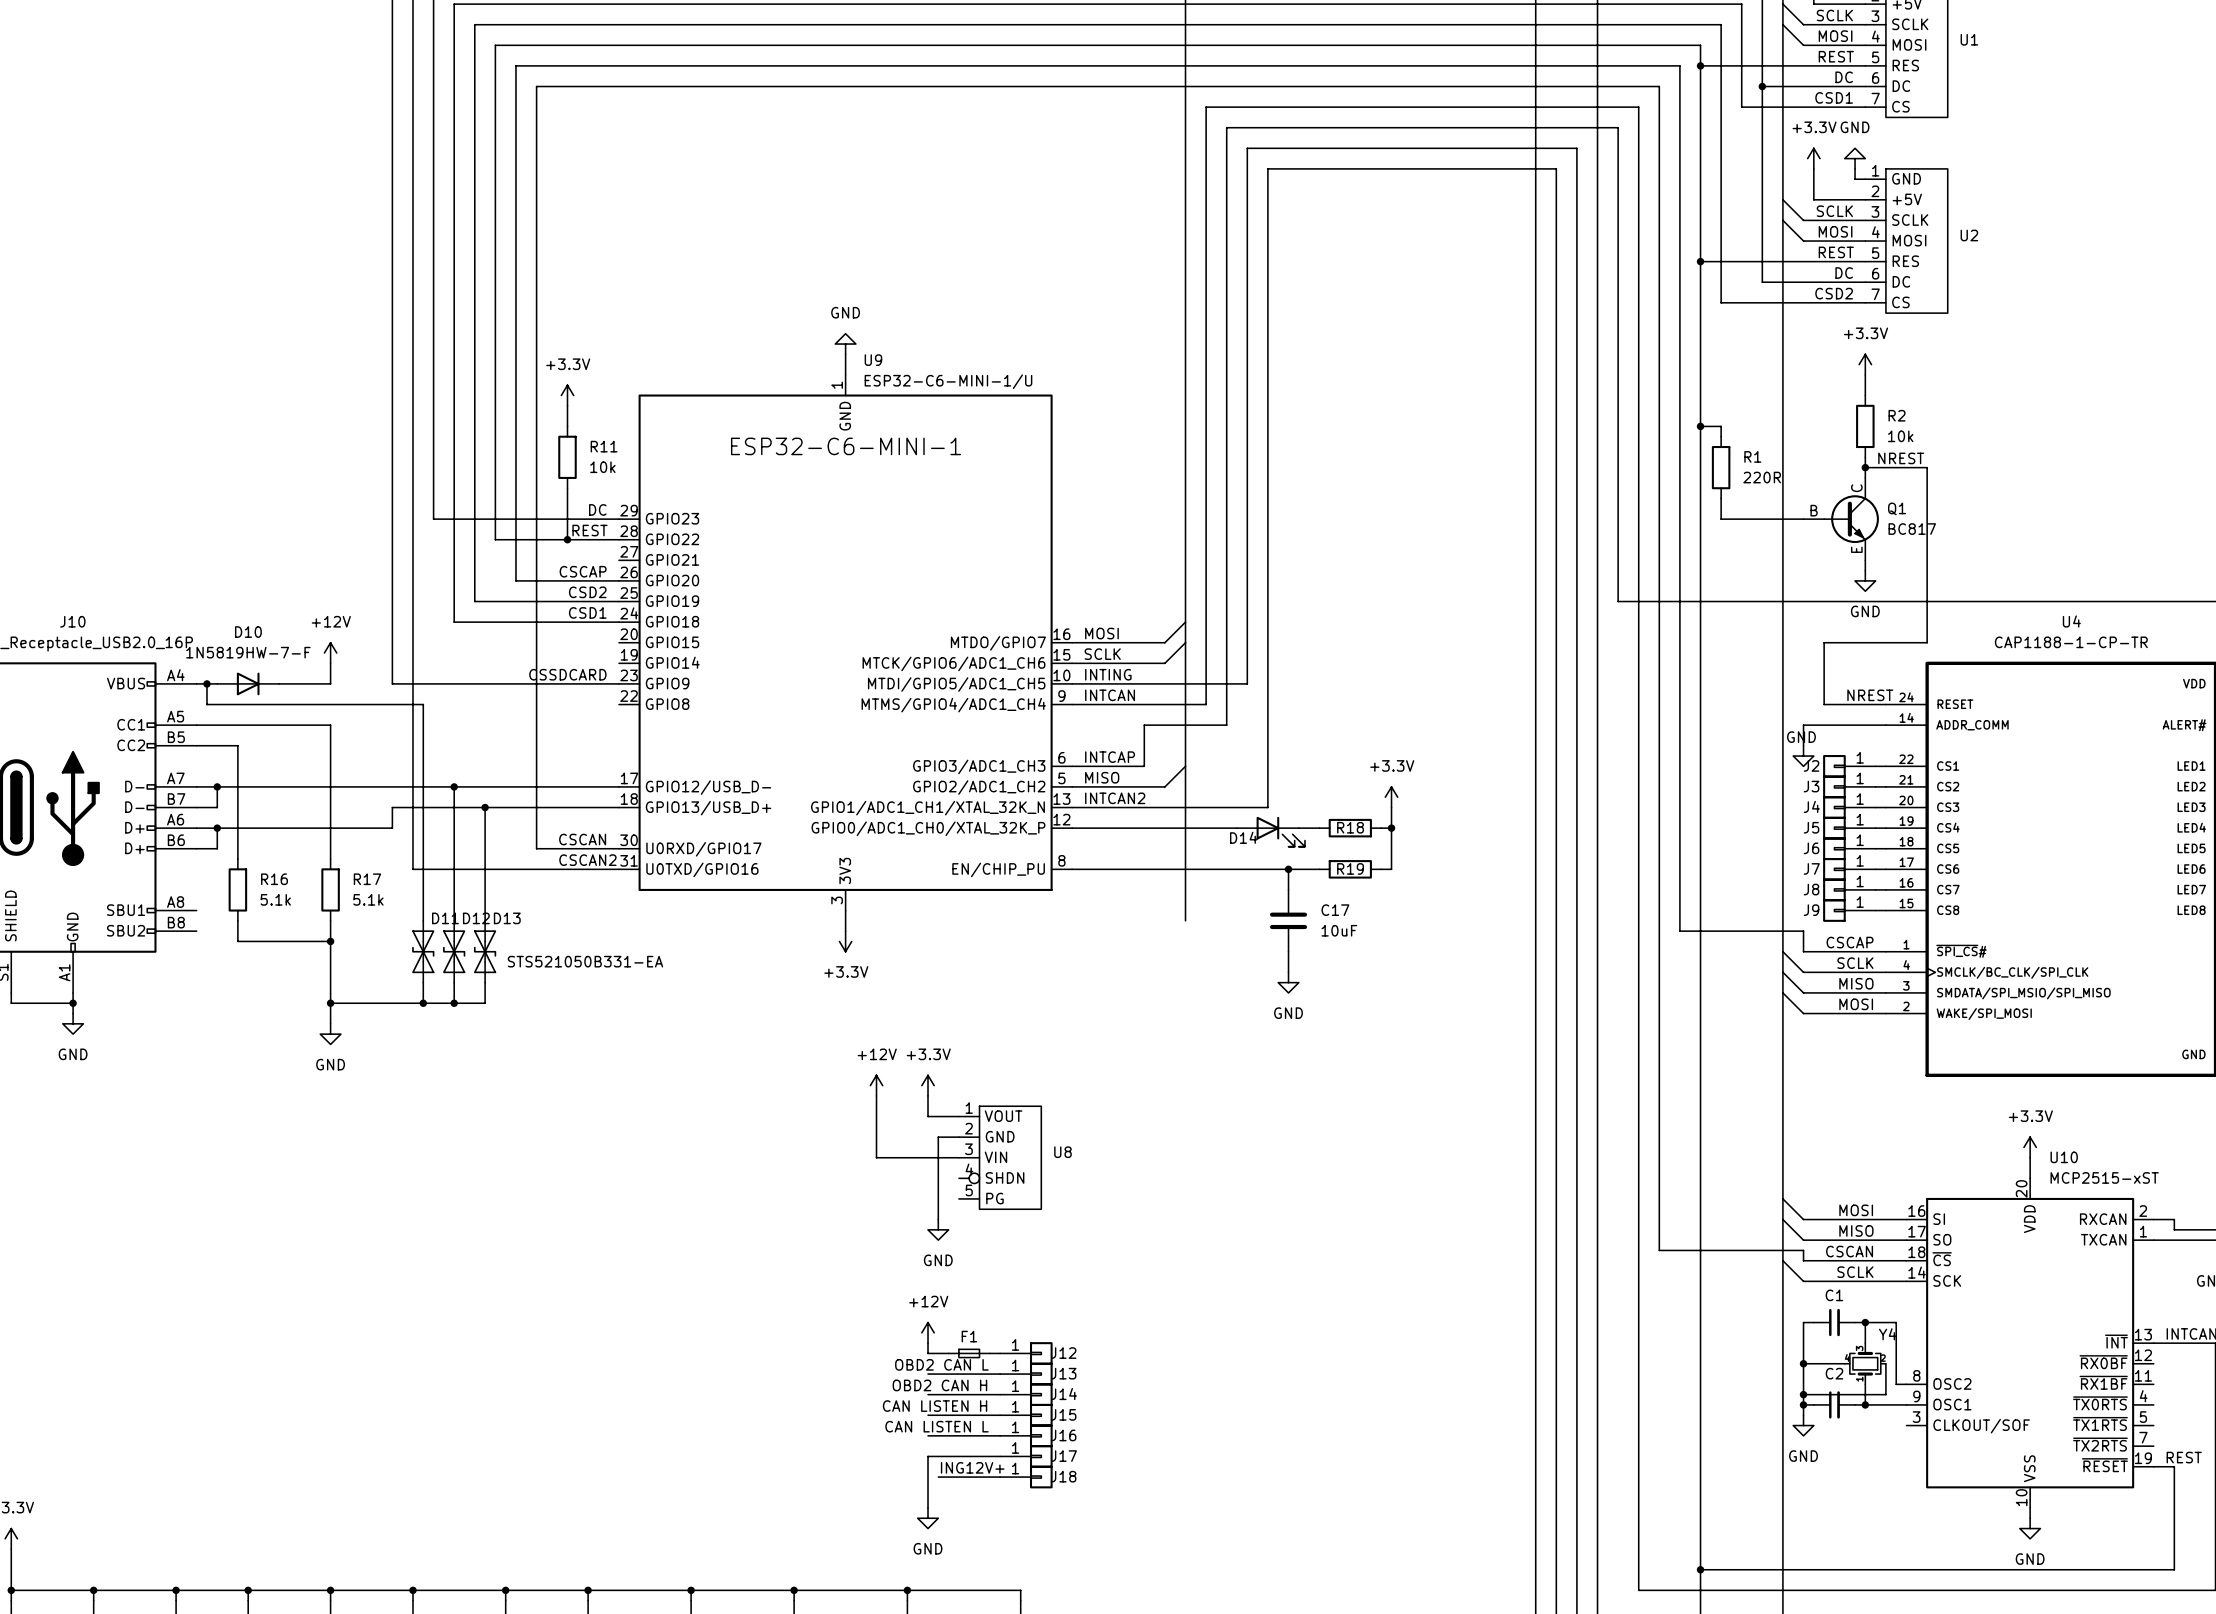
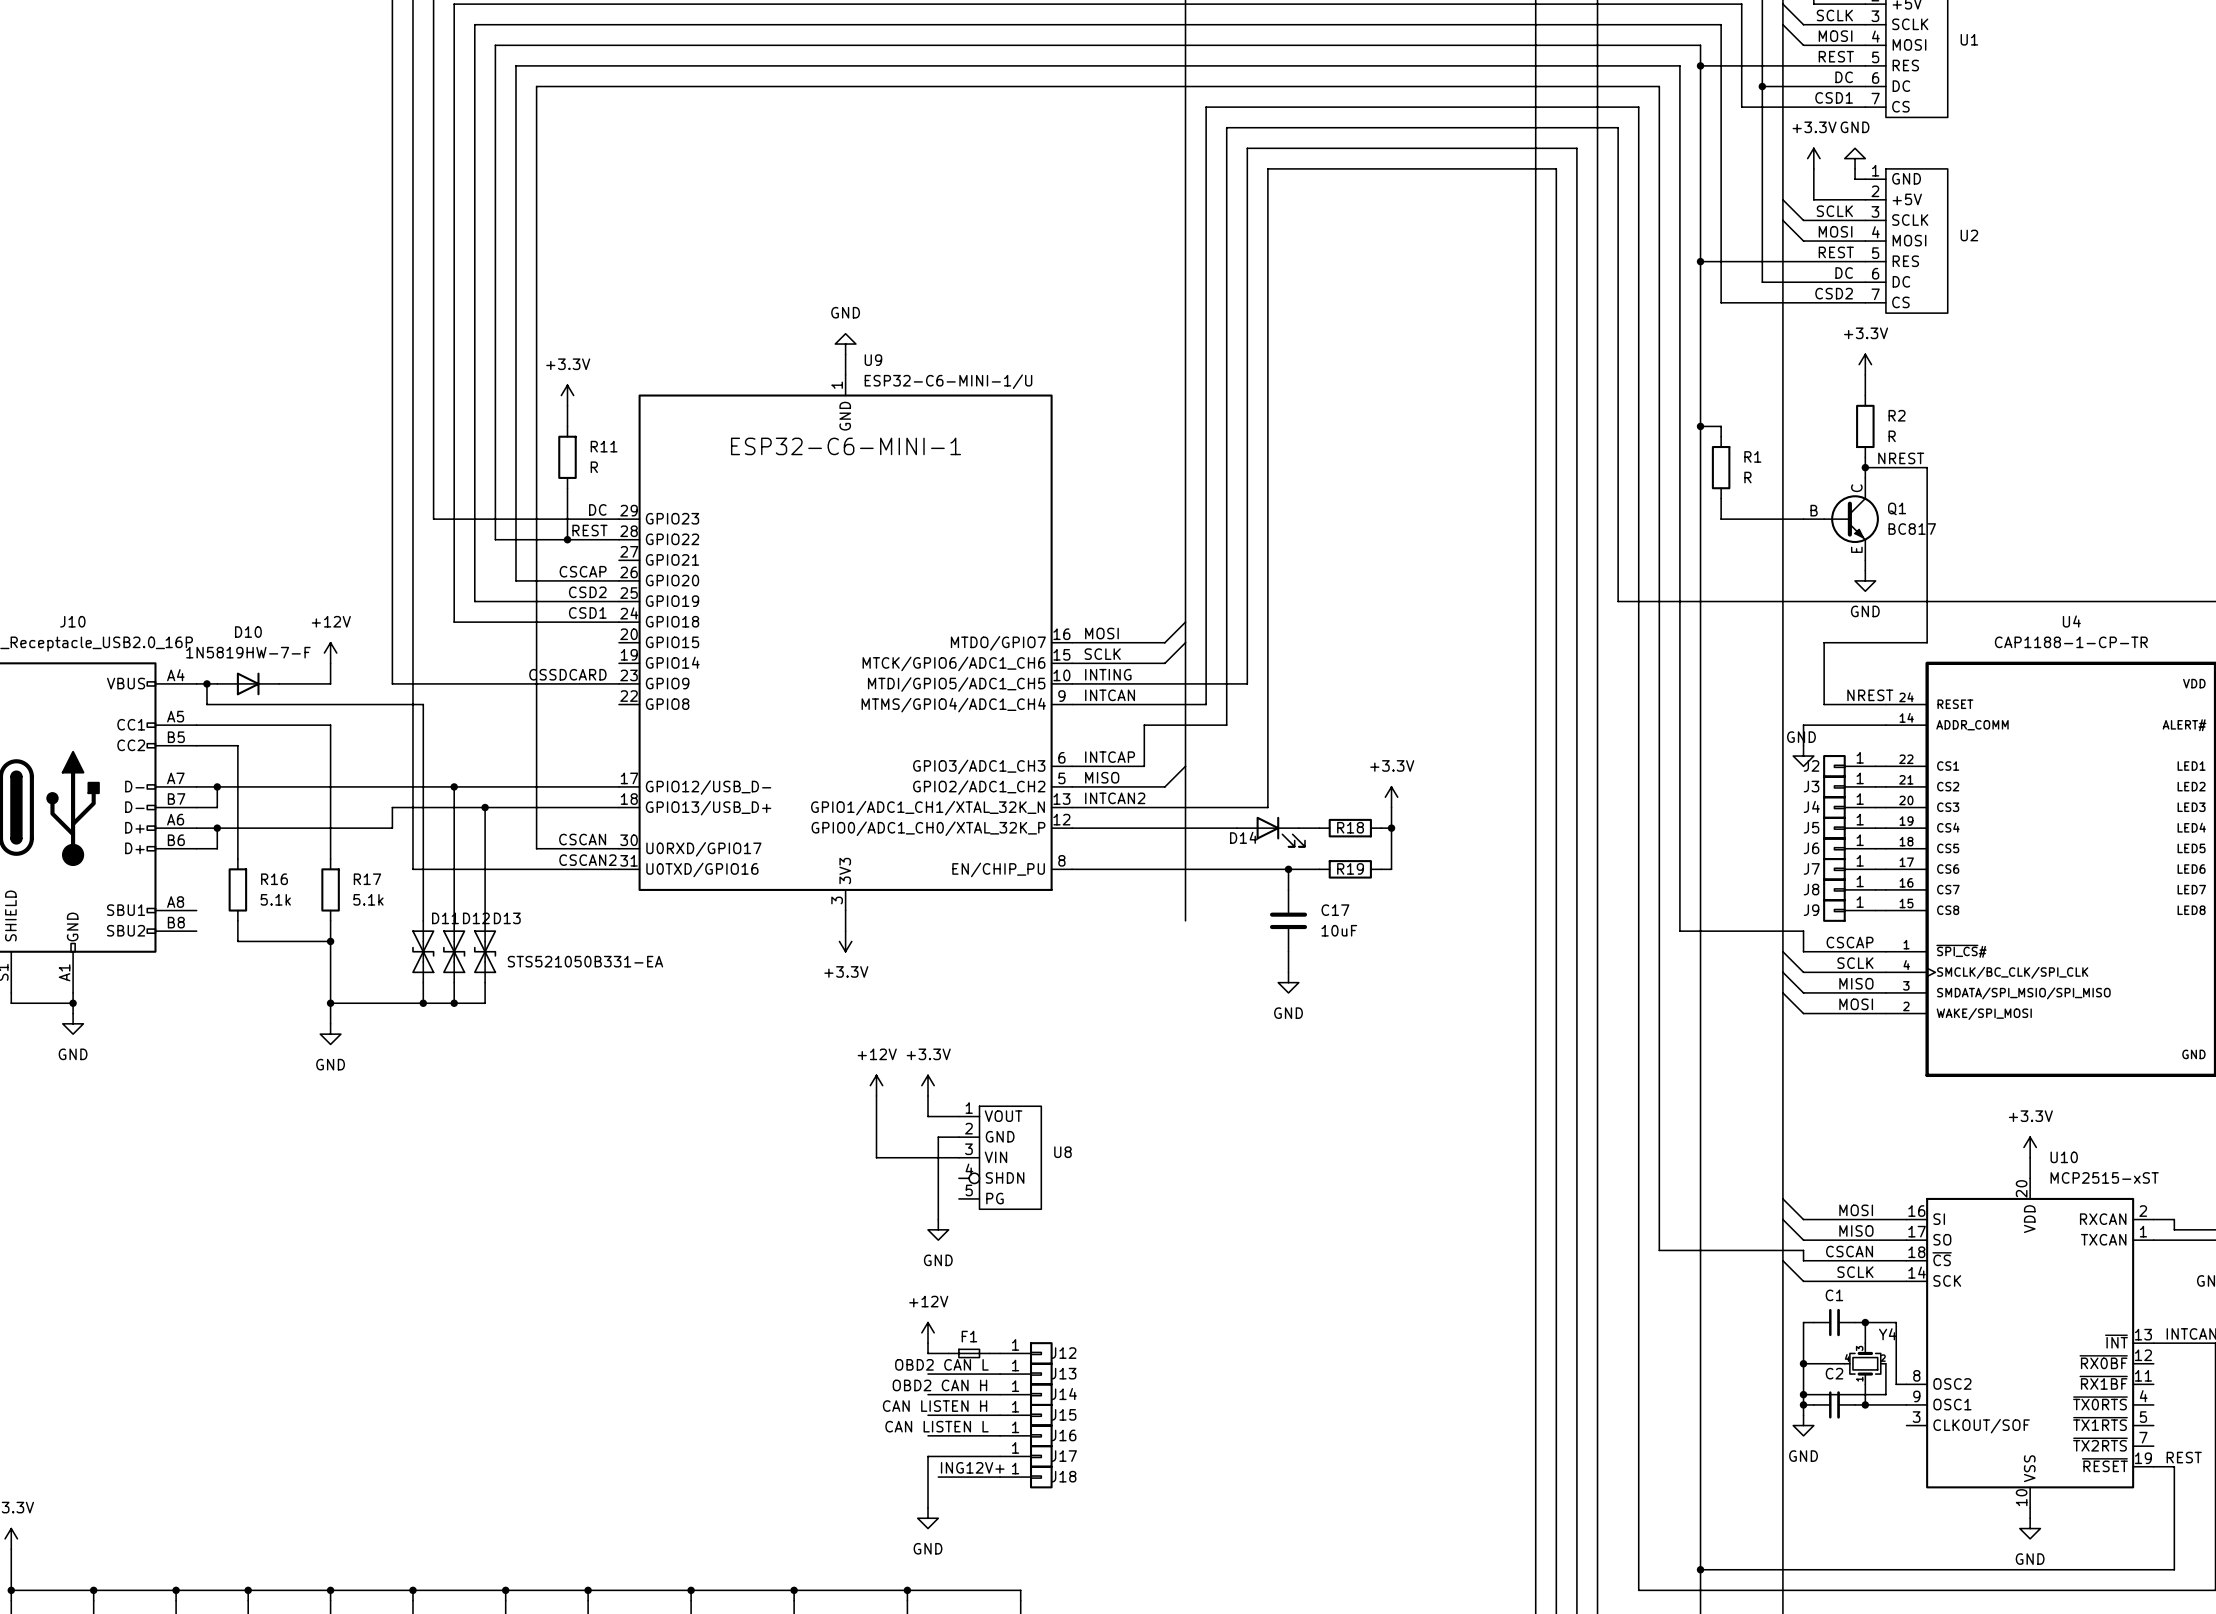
R2 value: 10k (1900, 436) -> R (1892, 436)
R11 value: 10k (602, 467) -> R (594, 467)
R1 value: 220R (1762, 477) -> R (1747, 477)

